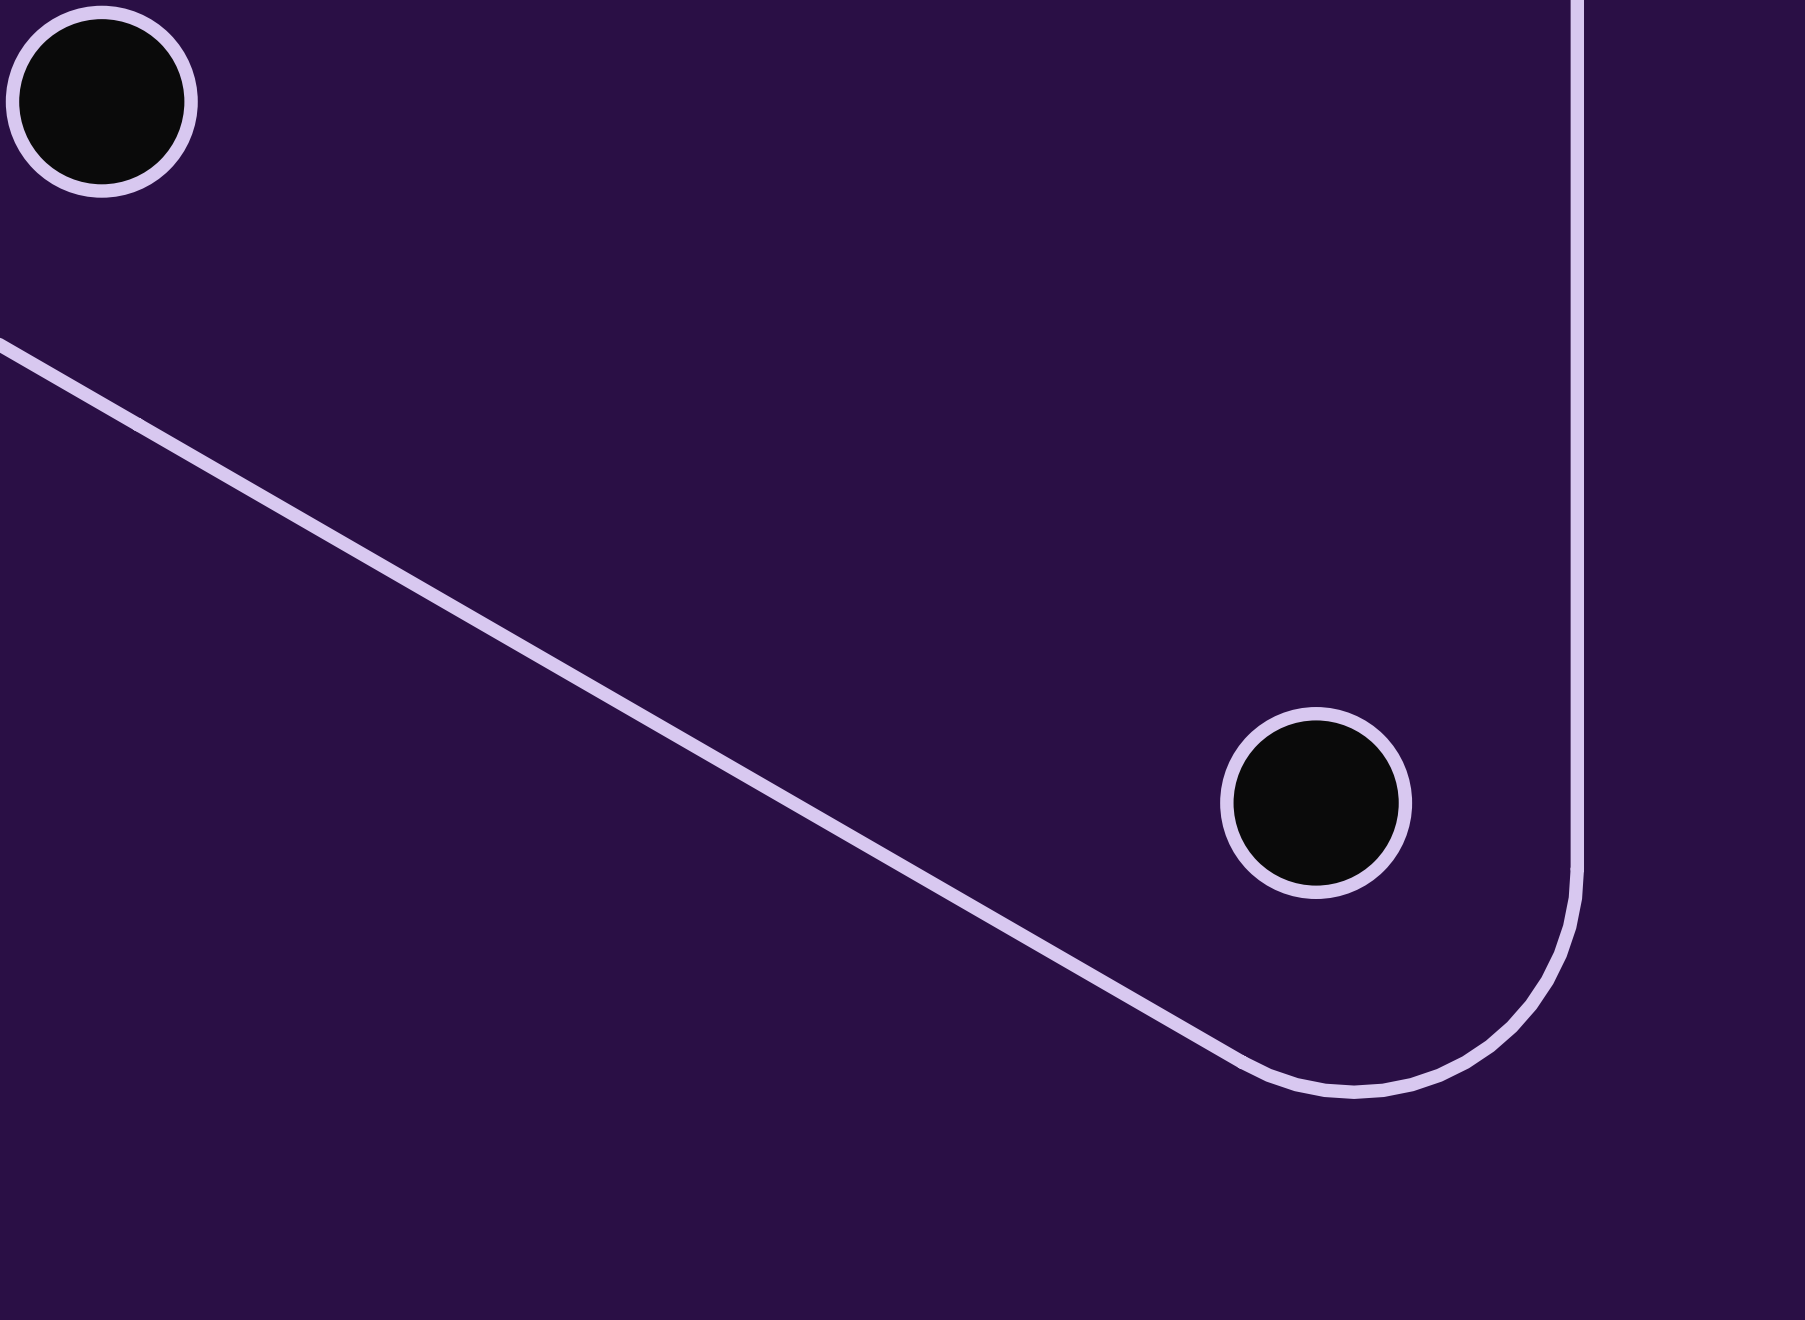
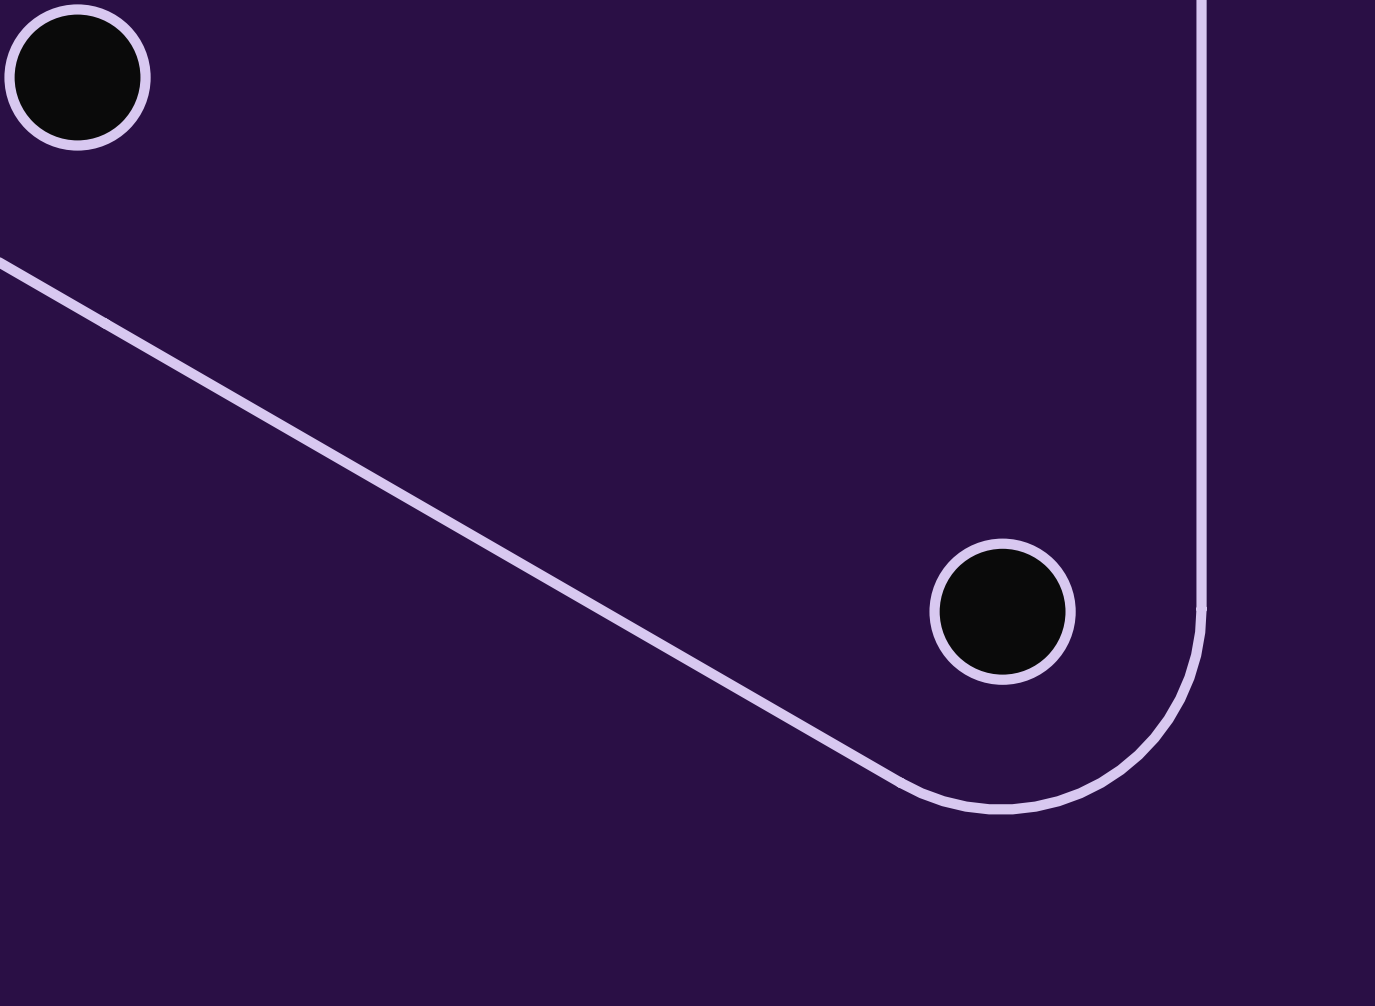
board edge: (1577, 799) (1575, 898) (1569, 926) (1560, 954) (1547, 980) (1531, 1004) (1511, 1026) (1489, 1046) (1465, 1062) (1439, 1075) (1411, 1084) (1383, 1090) (1354, 1092) (1324, 1090) (1296, 1084) (1268, 1075) (1182, 1027) -> (1201, 608) (1196, 655) (1180, 699) (1168, 719) (1138, 754) (1101, 782) (1058, 801) (1012, 809) (989, 809) (943, 801) (900, 782)

